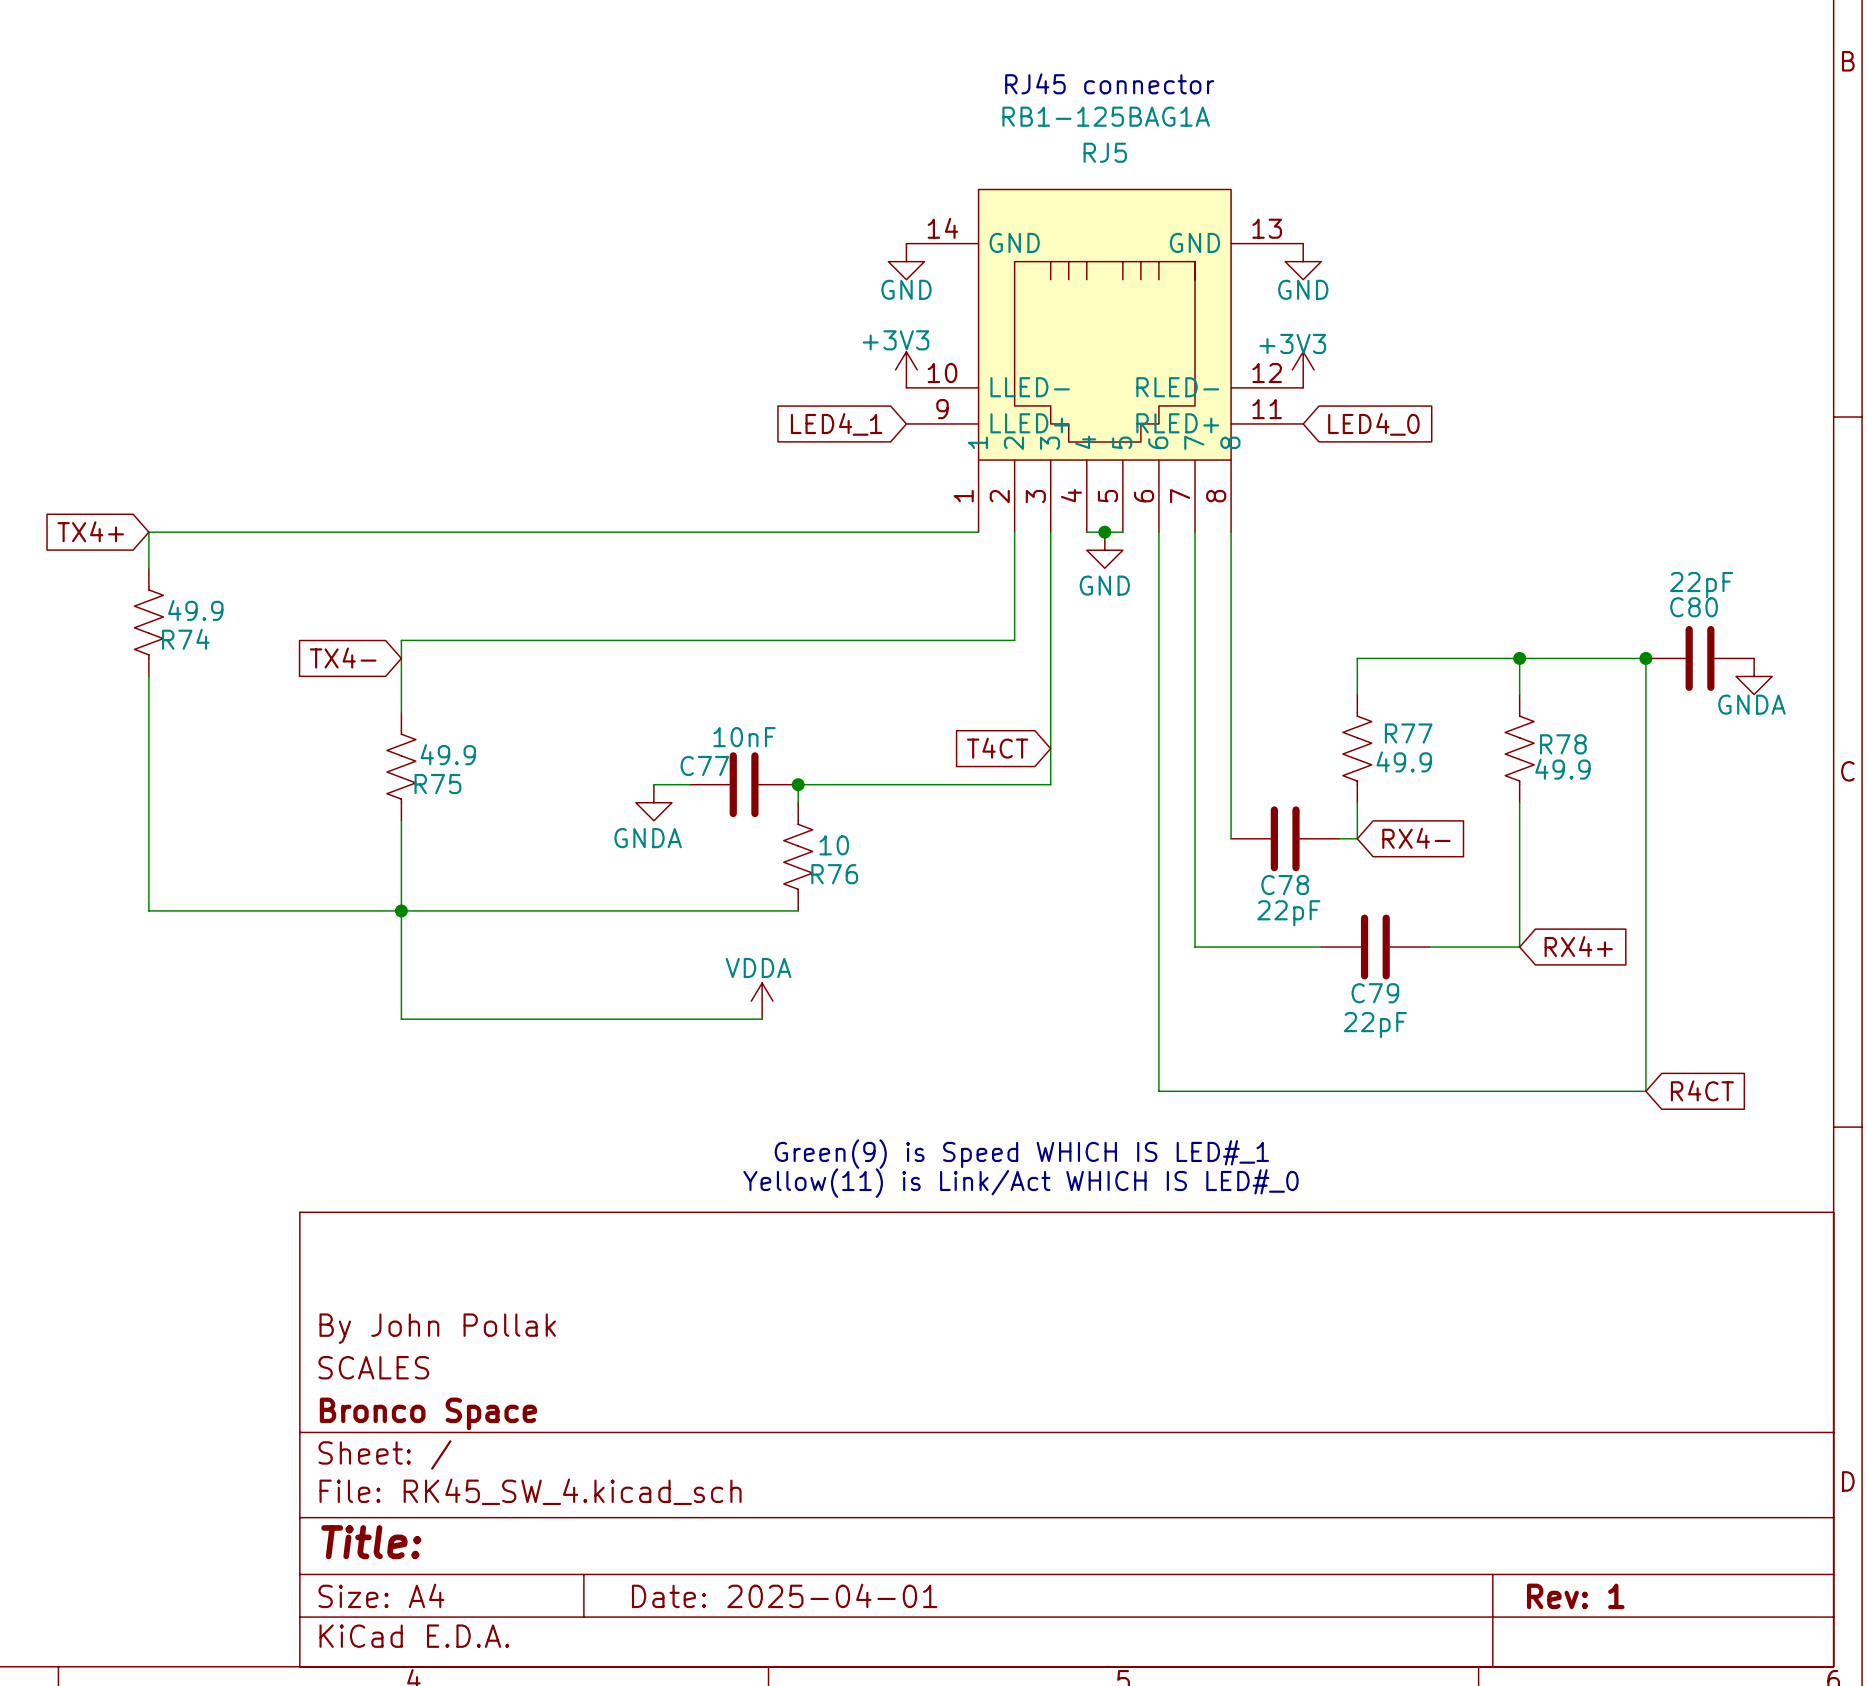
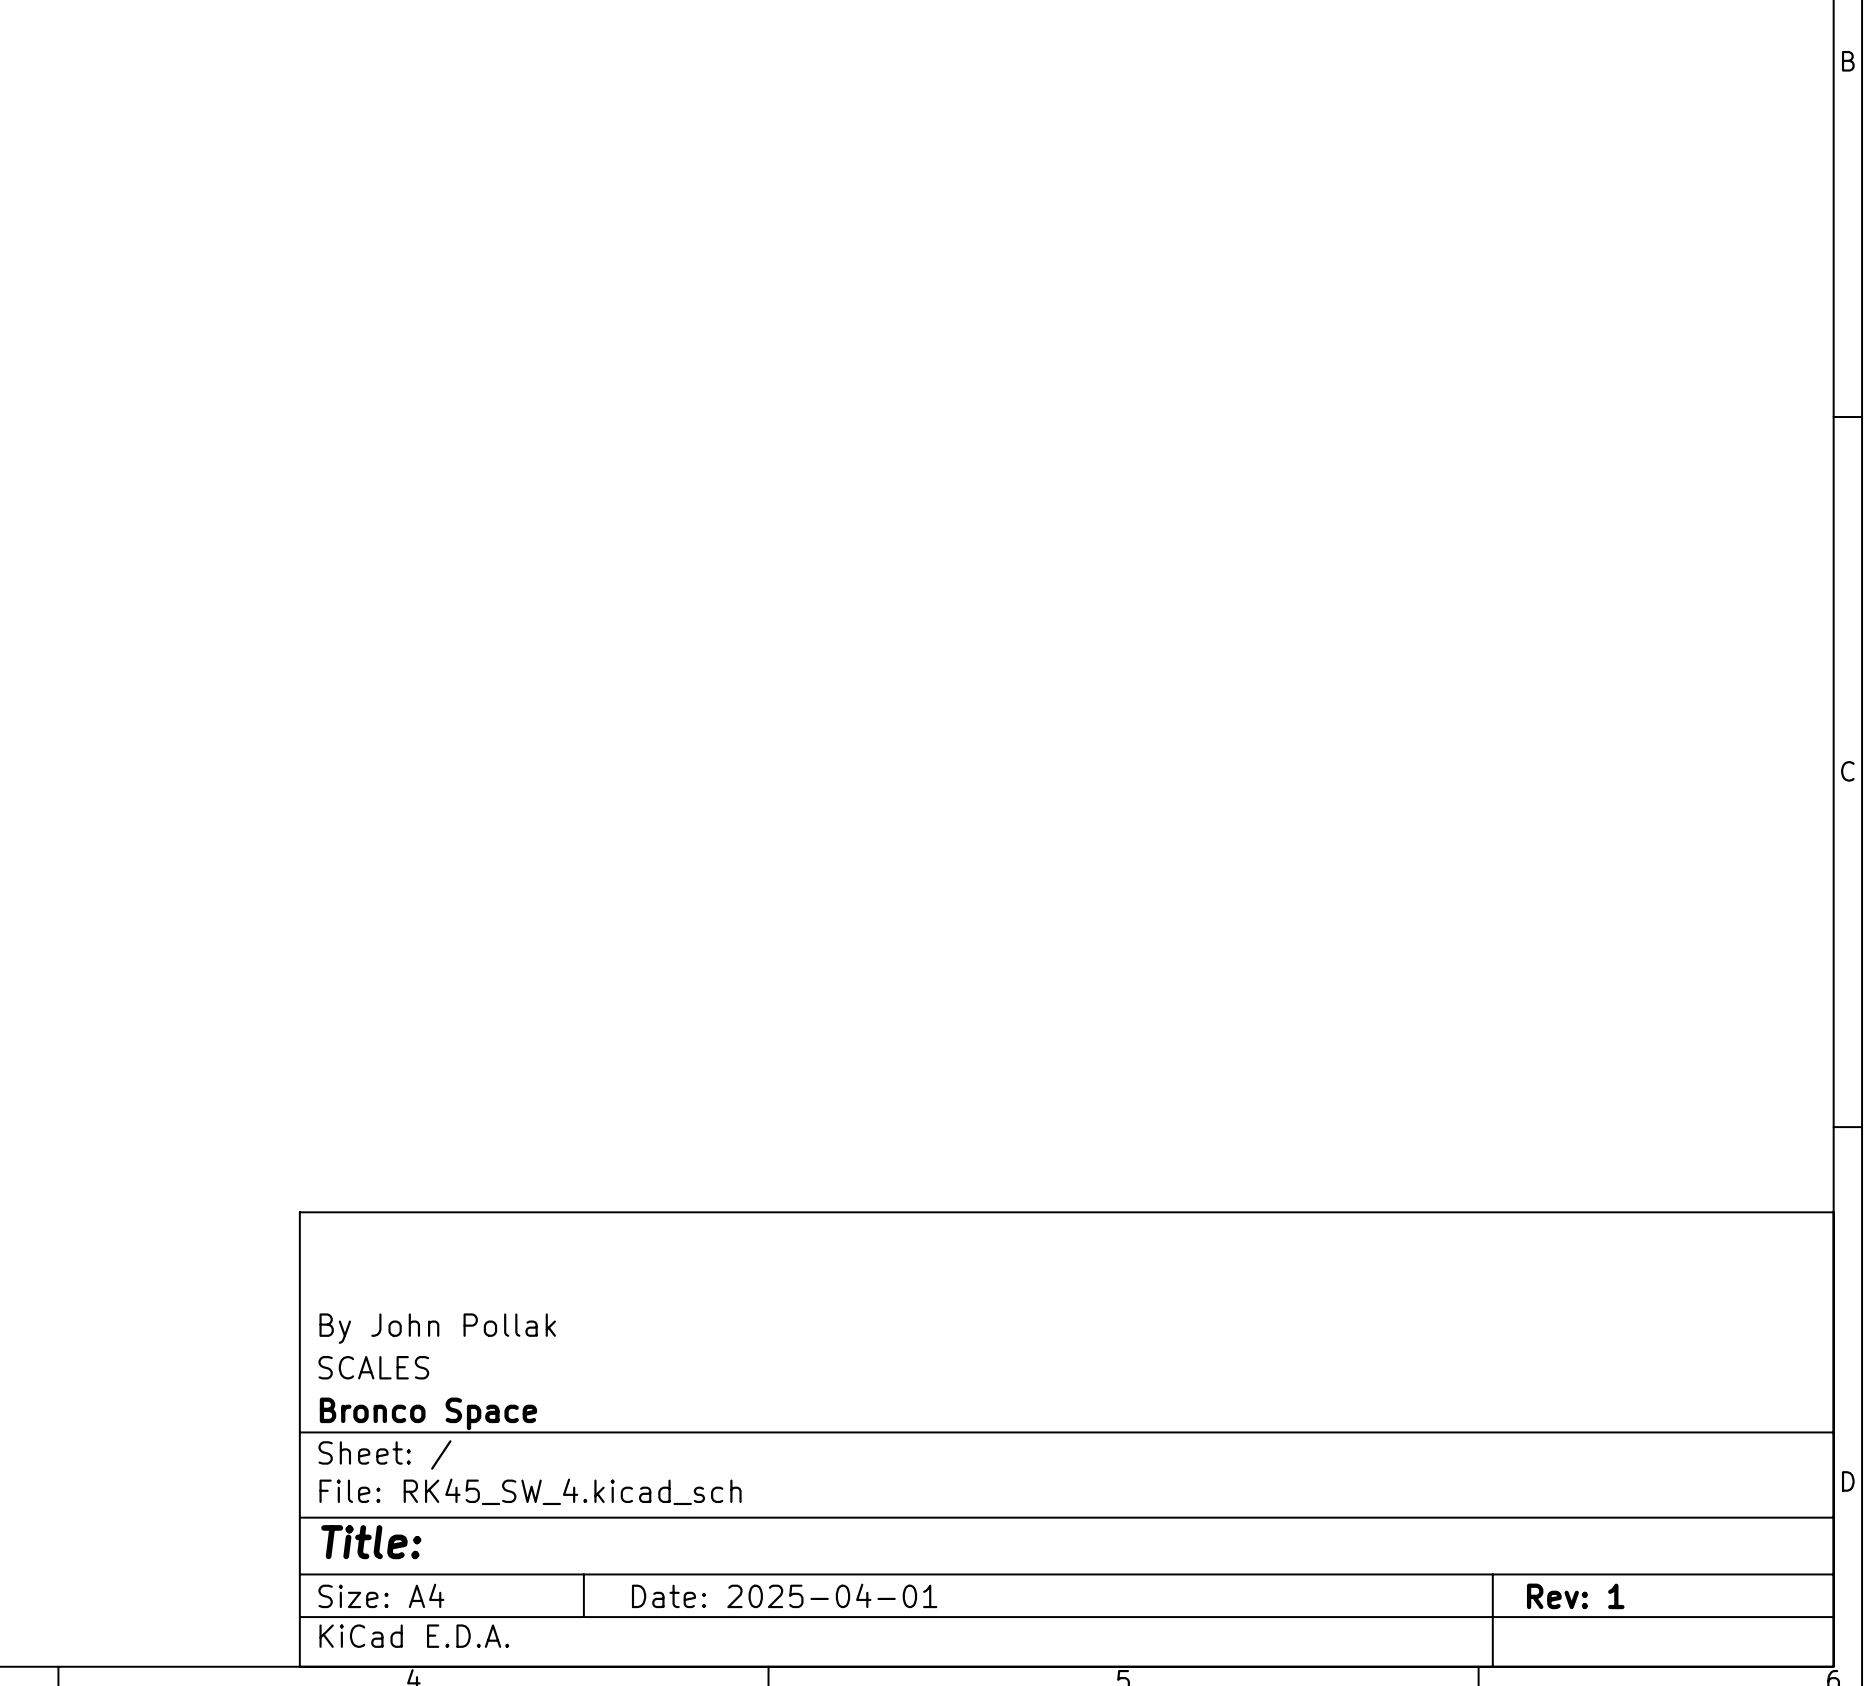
text: RJ45 connector (1109, 83) -> none
power symbol: GND (906, 261) -> none
power symbol: GND (1303, 261) -> none
RJ5: RB1-125BAG1A (1104, 360) -> none
power symbol: +3V3 (906, 369) -> none
power symbol: +3V3 (1303, 369) -> none
global label: LED4_1 (836, 424) -> none
global label: LED4_0 (1373, 424) -> none
global label: TX4+ (90, 531) -> none
wire: (978, 532) (148, 532) (148, 568) -> none
wire: (1014, 532) (1014, 640) (401, 640) (401, 712) -> none
wire: (1050, 532) (1050, 784) (798, 784) (798, 802) -> none
wire: (1086, 532) (1122, 532) -> none
junction: (1104, 532) -> none
wire: (1158, 532) (1158, 1091) (1645, 1091) (1645, 658) (1357, 658) (1357, 694) -> none
wire: (1195, 532) (1195, 947) (1321, 947) -> none
wire: (1231, 532) (1231, 838) -> none
power symbol: GND (1104, 550) -> none
R74: 49.9 (148, 622) -> none
global label: TX4- (343, 658) -> none
wire: (1519, 658) (1519, 694) -> none
junction: (1519, 658) -> none
junction: (1645, 658) -> none
C80: 22pF (1700, 658) -> none
wire: (148, 676) (148, 910) (798, 910) -> none
power symbol: GNDA (1754, 676) -> none
global label: T4CT (997, 748) -> none
R77: 49.9 (1357, 748) -> none
R78: 49.9 (1519, 748) -> none
R75: 49.9 (401, 766) -> none
wire: (653, 784) (689, 784) -> none
C77: 10nF (744, 784) -> none
junction: (798, 784) -> none
power symbol: GNDA (653, 802) -> none
wire: (1357, 802) (1357, 838) (1339, 838) -> none
wire: (1519, 802) (1519, 947) (1429, 947) -> none
wire: (401, 820) (401, 1019) (762, 1019) -> none
C78: 22pF (1285, 838) -> none
global label: RX4- (1416, 838) -> none
R76: 10 (798, 856) -> none
junction: (401, 910) -> none
global label: RX4+ (1578, 946) -> none
C79: 22pF (1375, 947) -> none
power symbol: VDDA (762, 1001) -> none
global label: R4CT (1702, 1090) -> none
text: Green(9) is Speed WHICH IS LED#_1 (1021, 1154) -> none
text: Yellow(11) is Link/Act WHICH IS LED#_0 (1020, 1183) -> none

